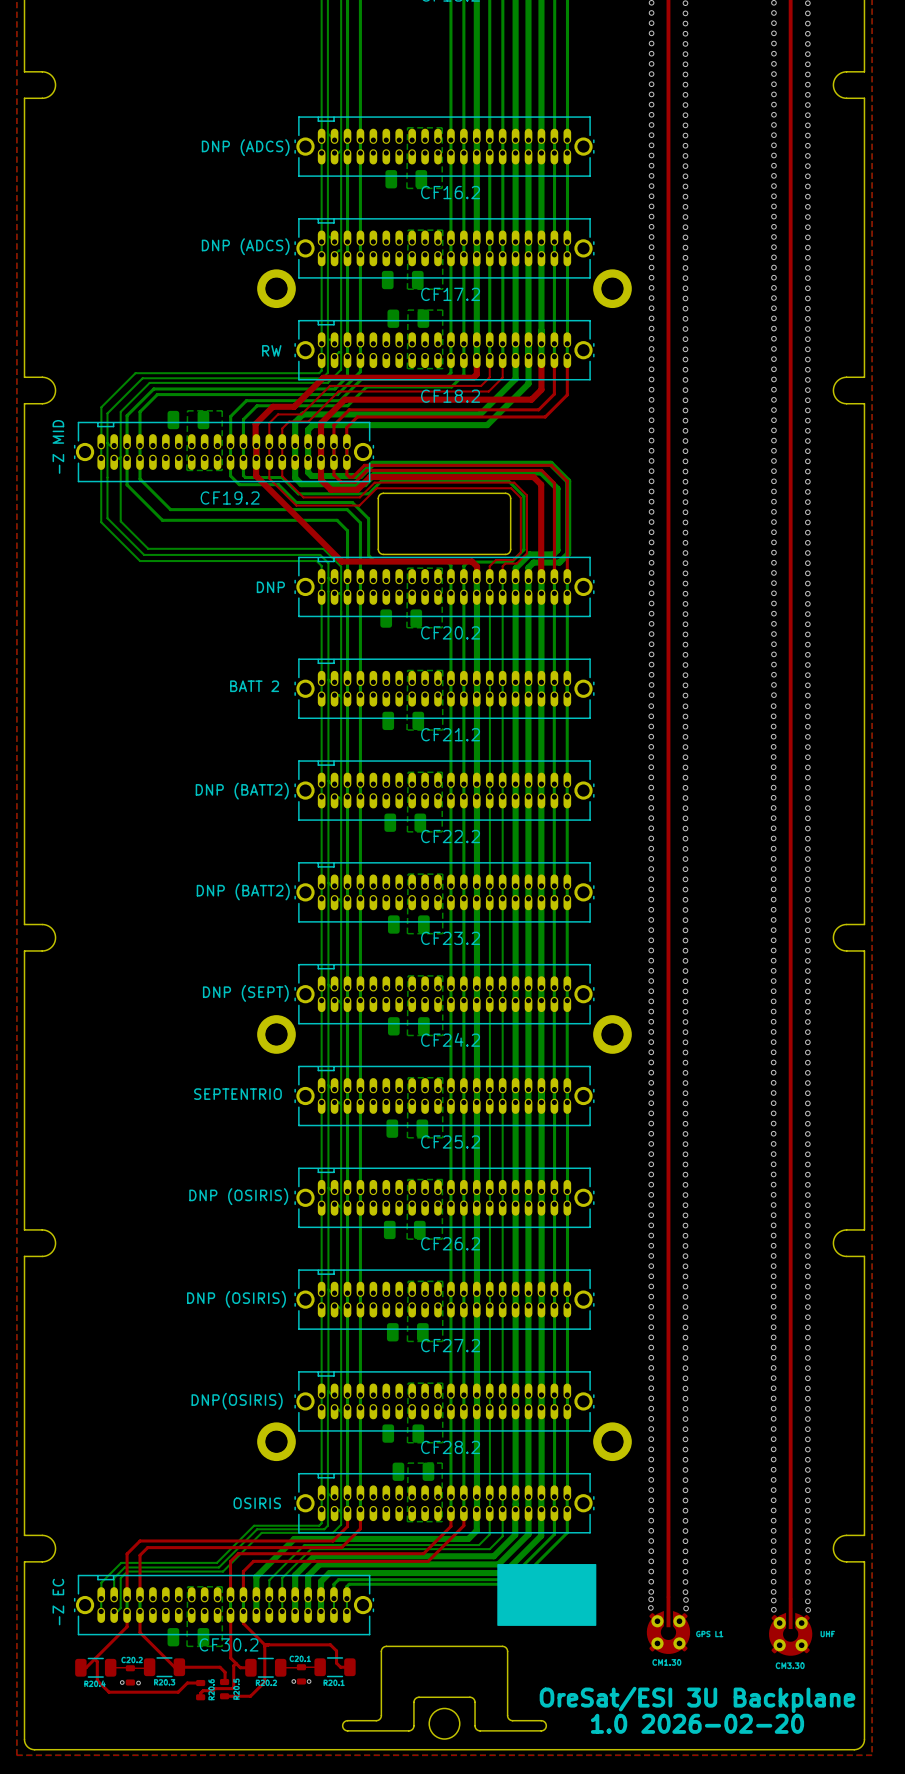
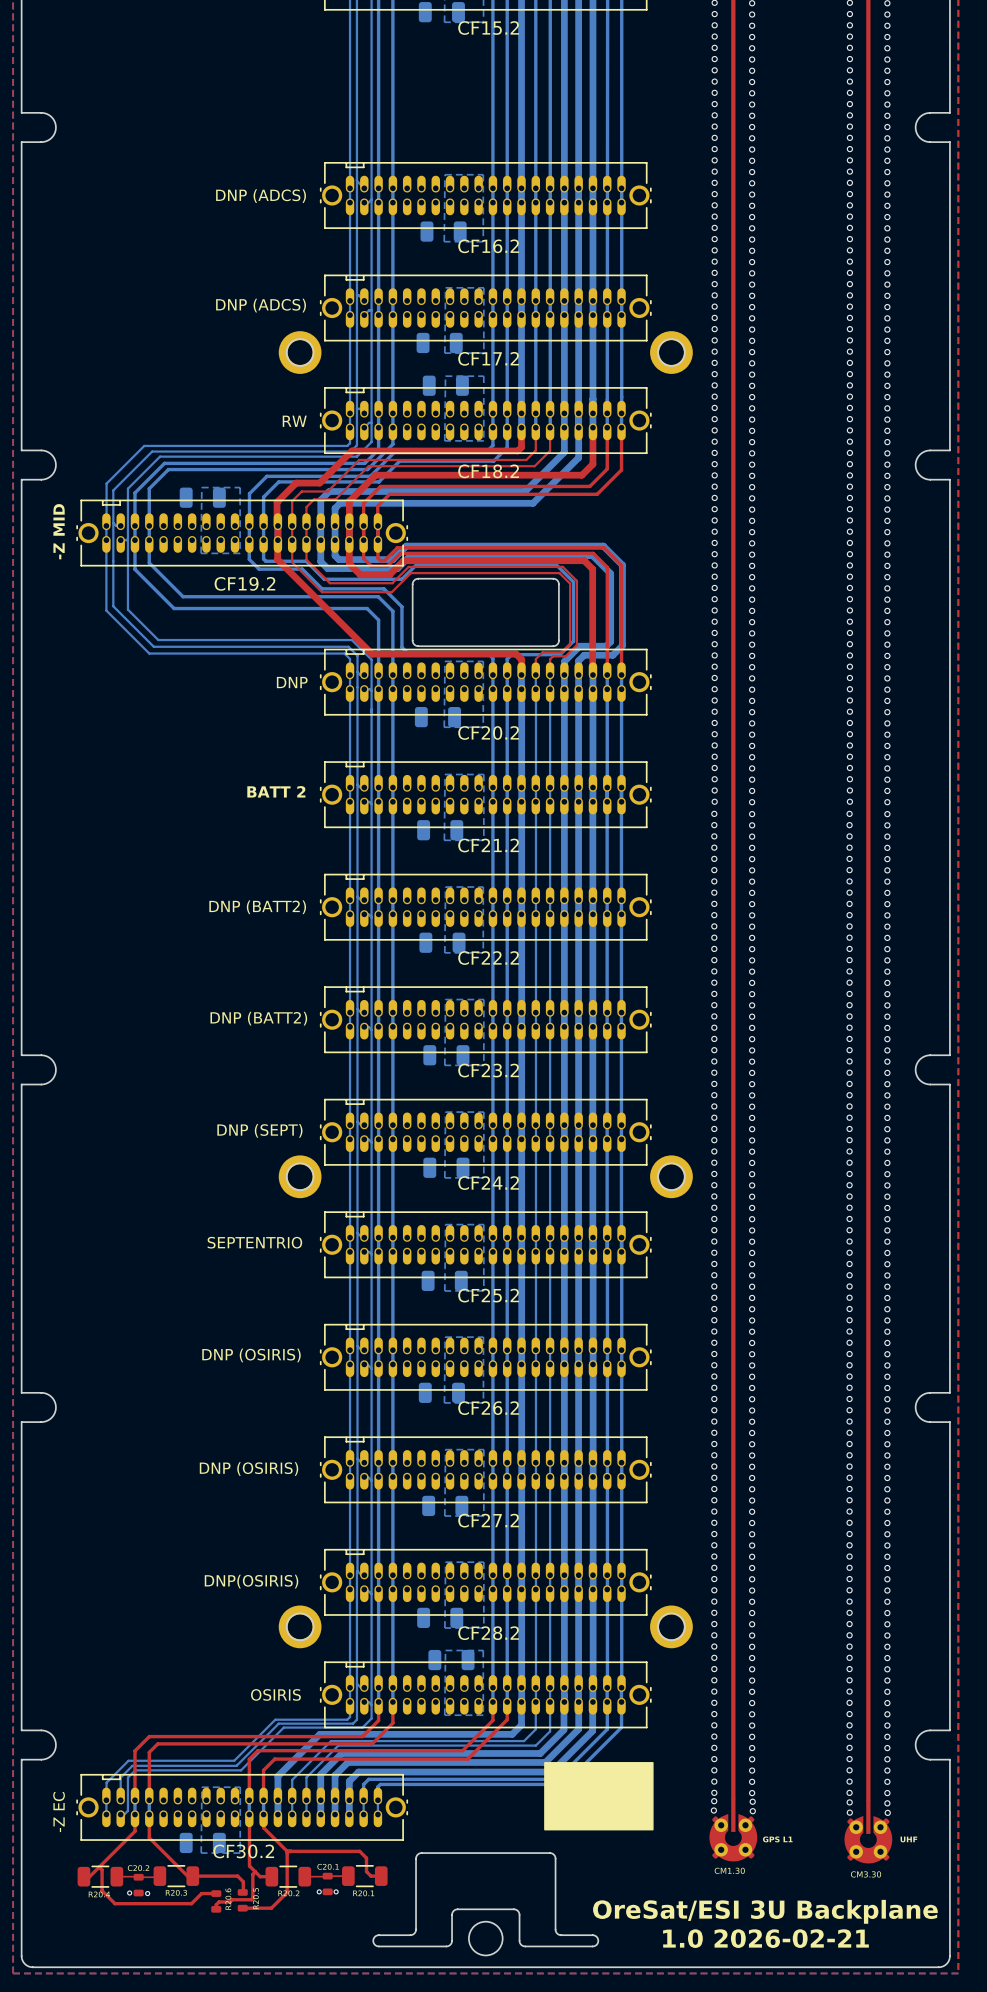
text: 1.0 2026-02-20 (697, 1723) -> 1.0 2026-02-21 (765, 1938)

